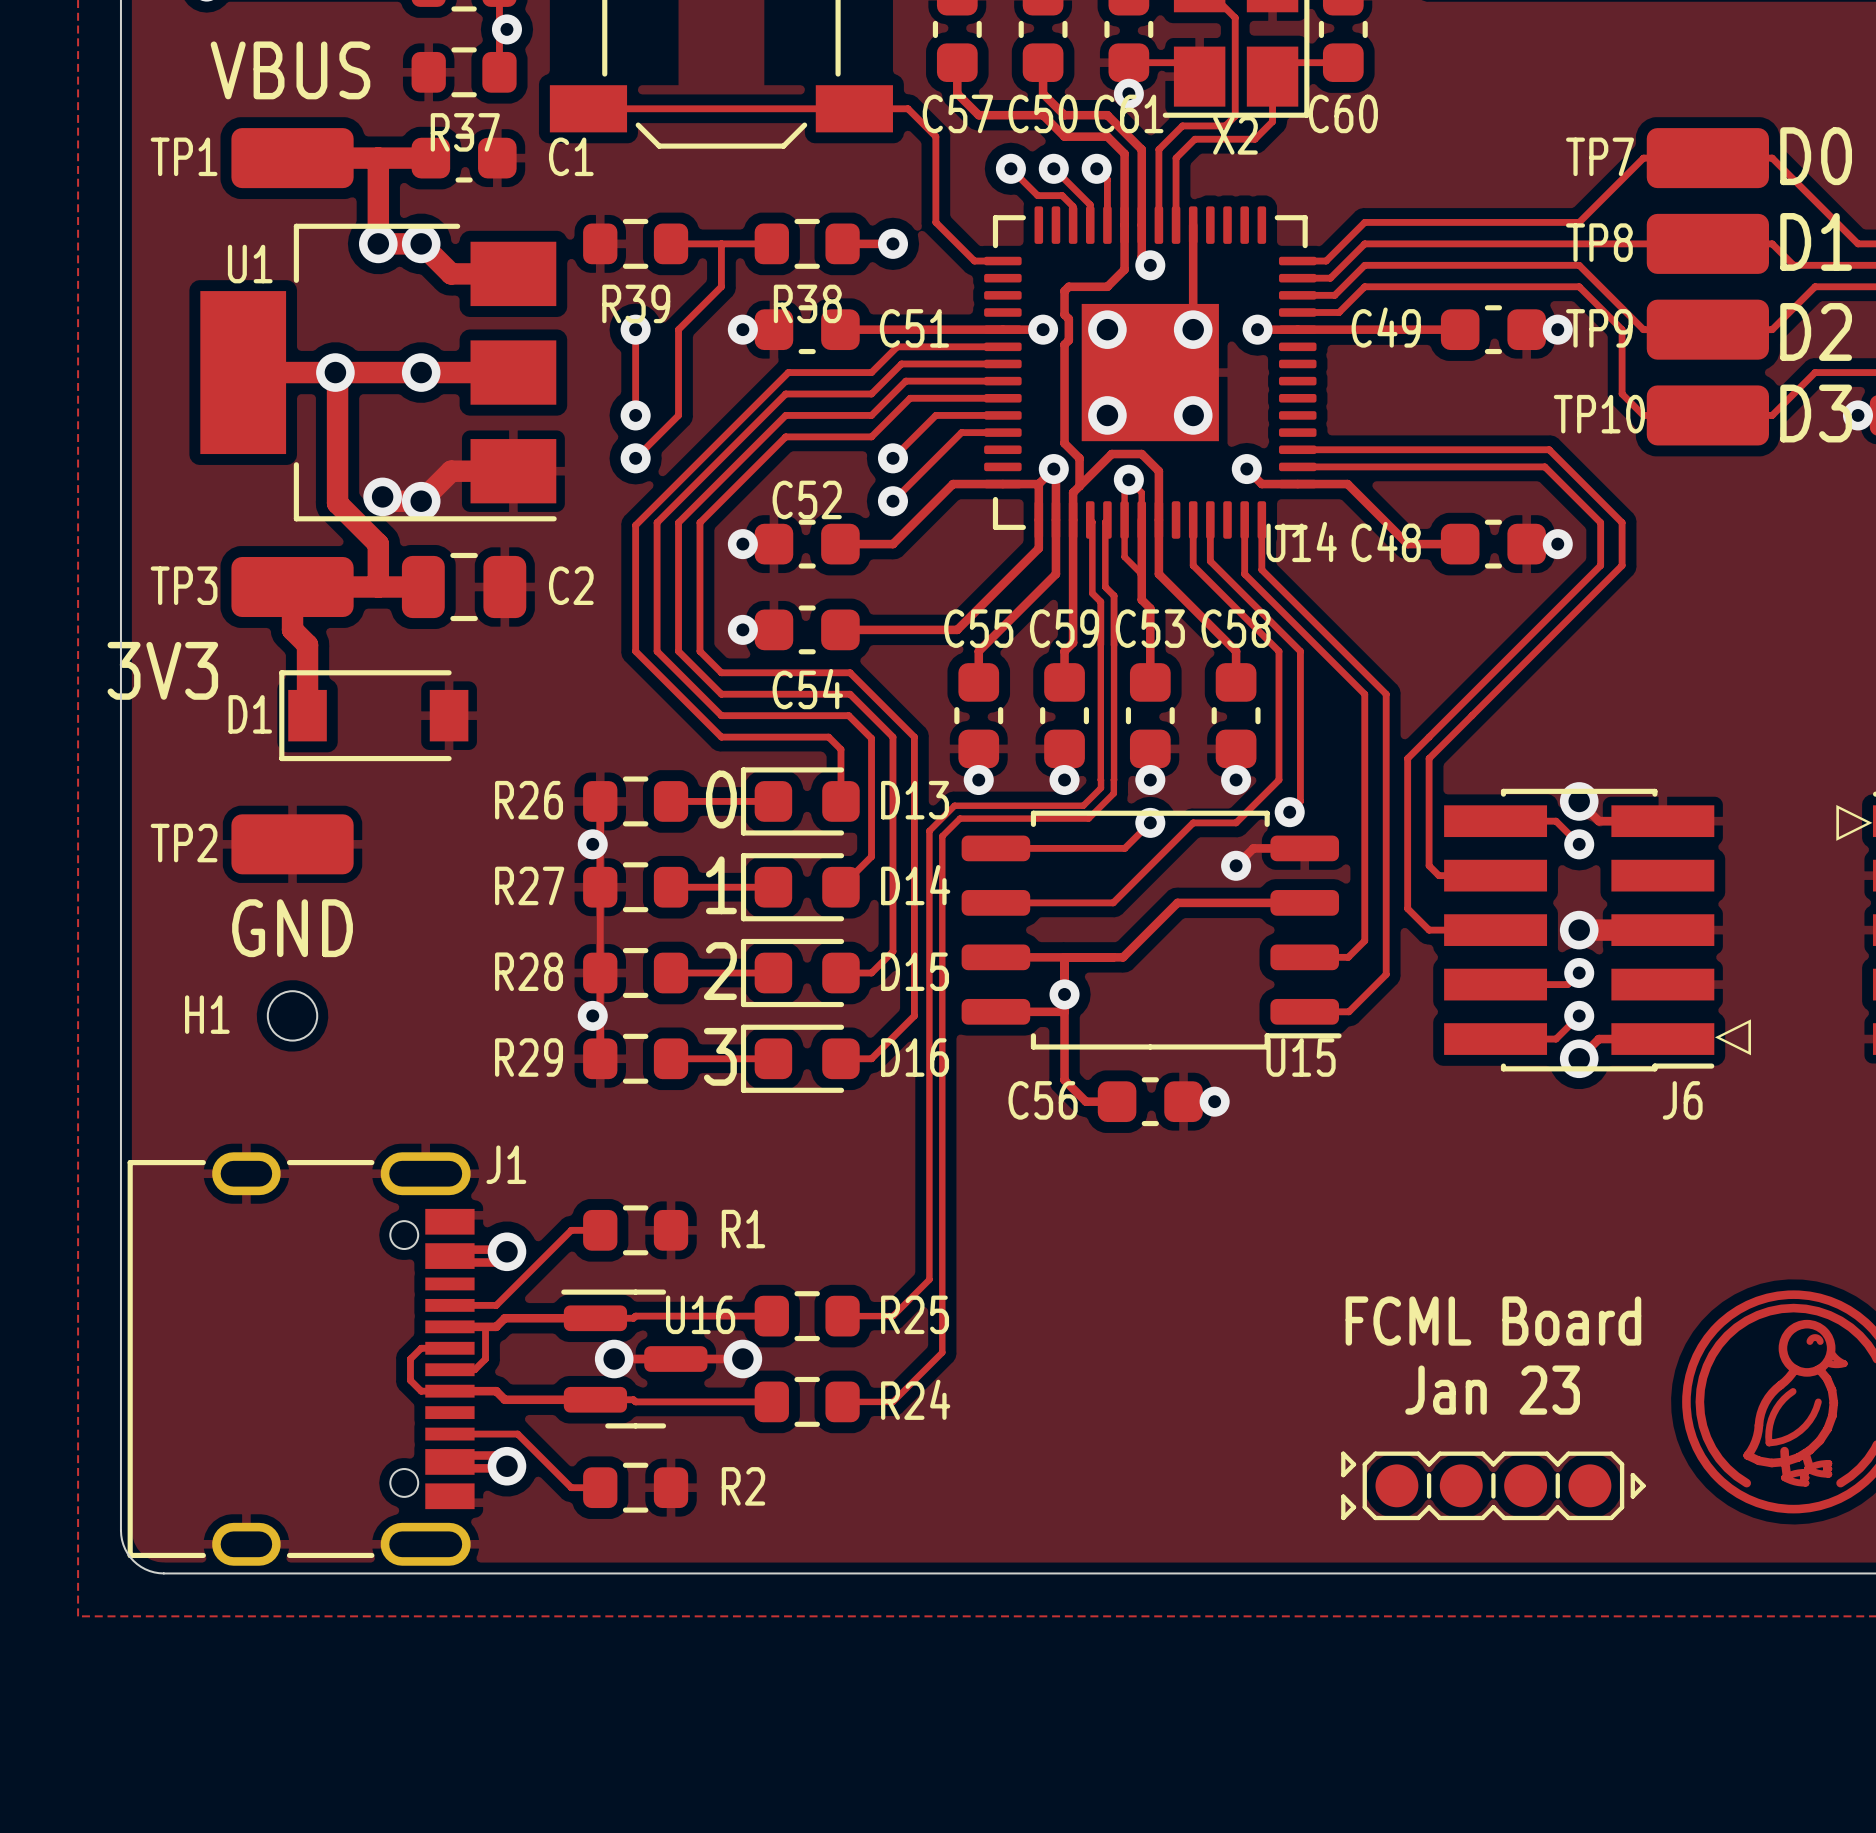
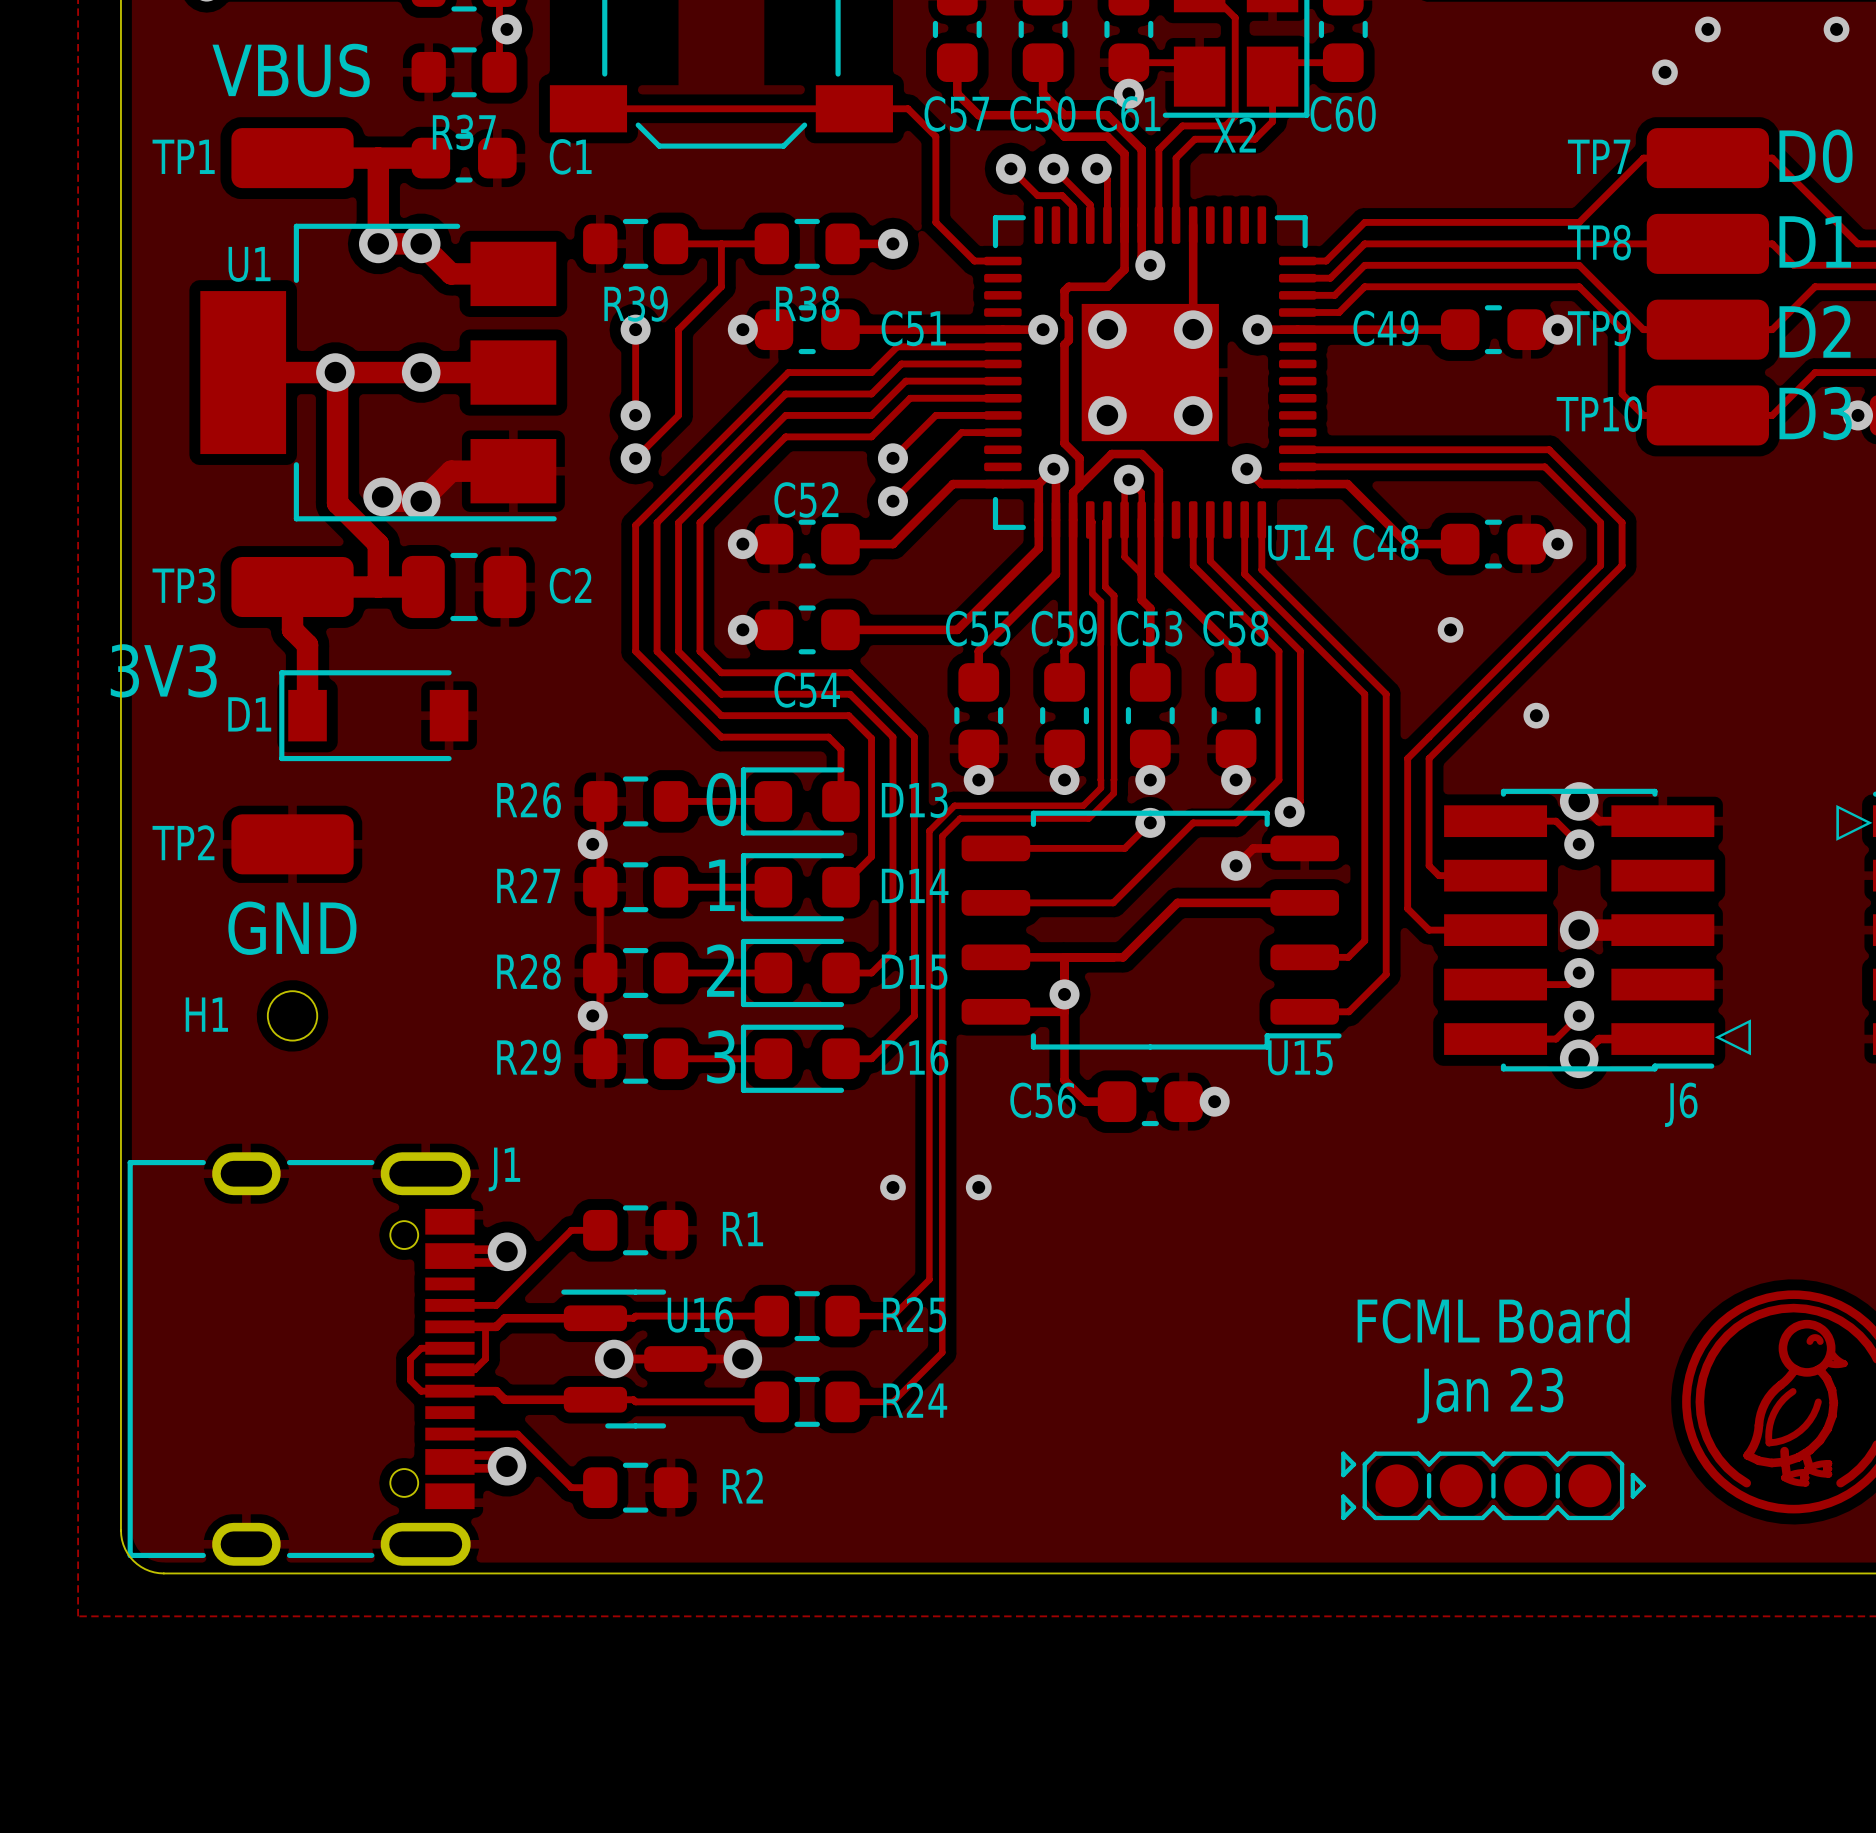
via: none -> (1707, 29)
via: none -> (1836, 29)
via: none -> (1664, 72)
via: none -> (1450, 629)
via: none -> (1536, 715)
via: none -> (892, 1187)
via: none -> (978, 1187)

